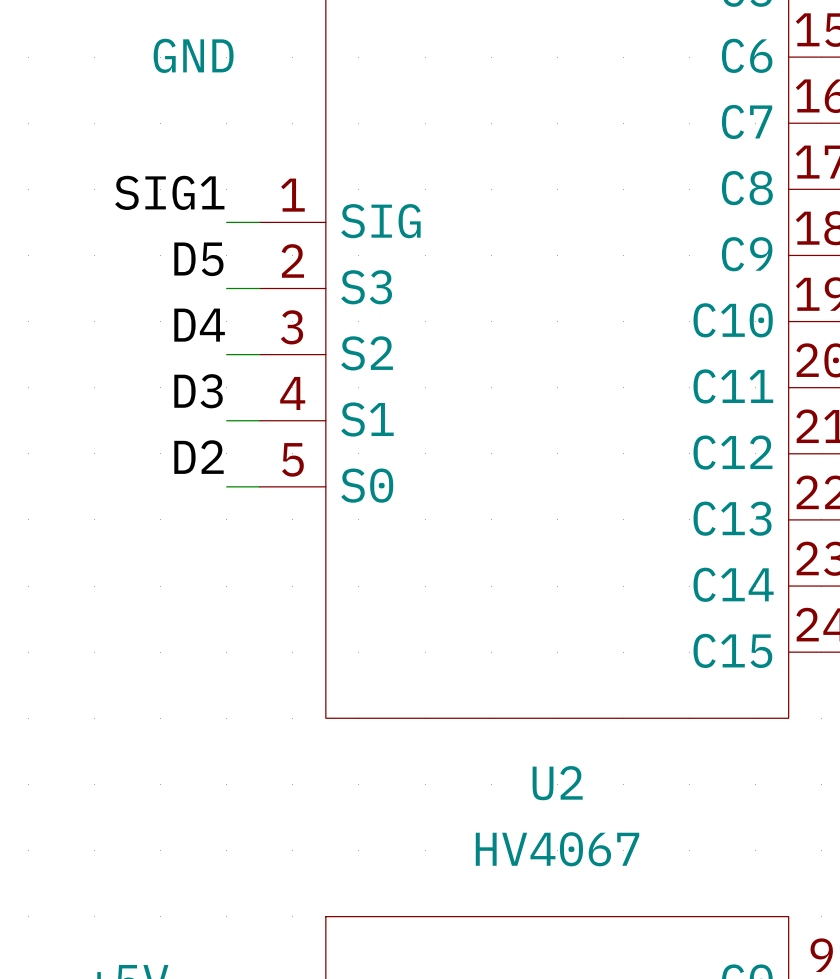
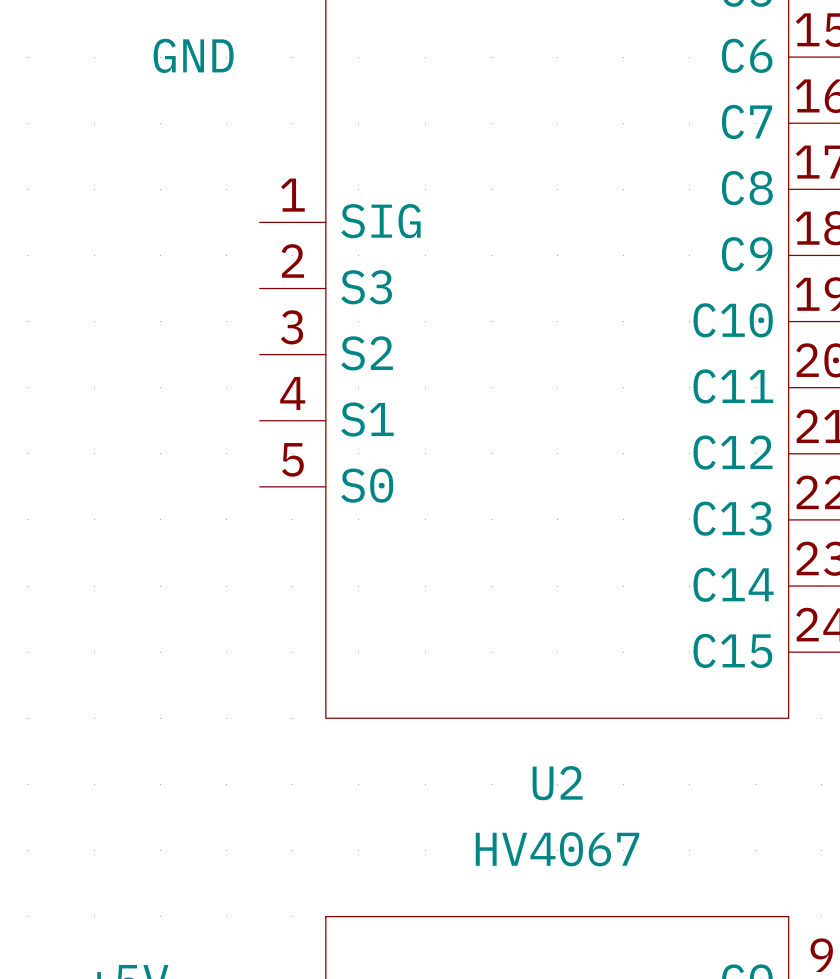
label: SIG1 (169, 192) -> none
wire: (226, 222) (259, 222) -> none
label: D5 (198, 259) -> none
wire: (226, 288) (259, 288) -> none
label: D4 (199, 325) -> none
wire: (226, 354) (259, 354) -> none
label: D3 (198, 391) -> none
wire: (226, 420) (259, 420) -> none
label: D2 (199, 457) -> none
wire: (226, 486) (259, 486) -> none

